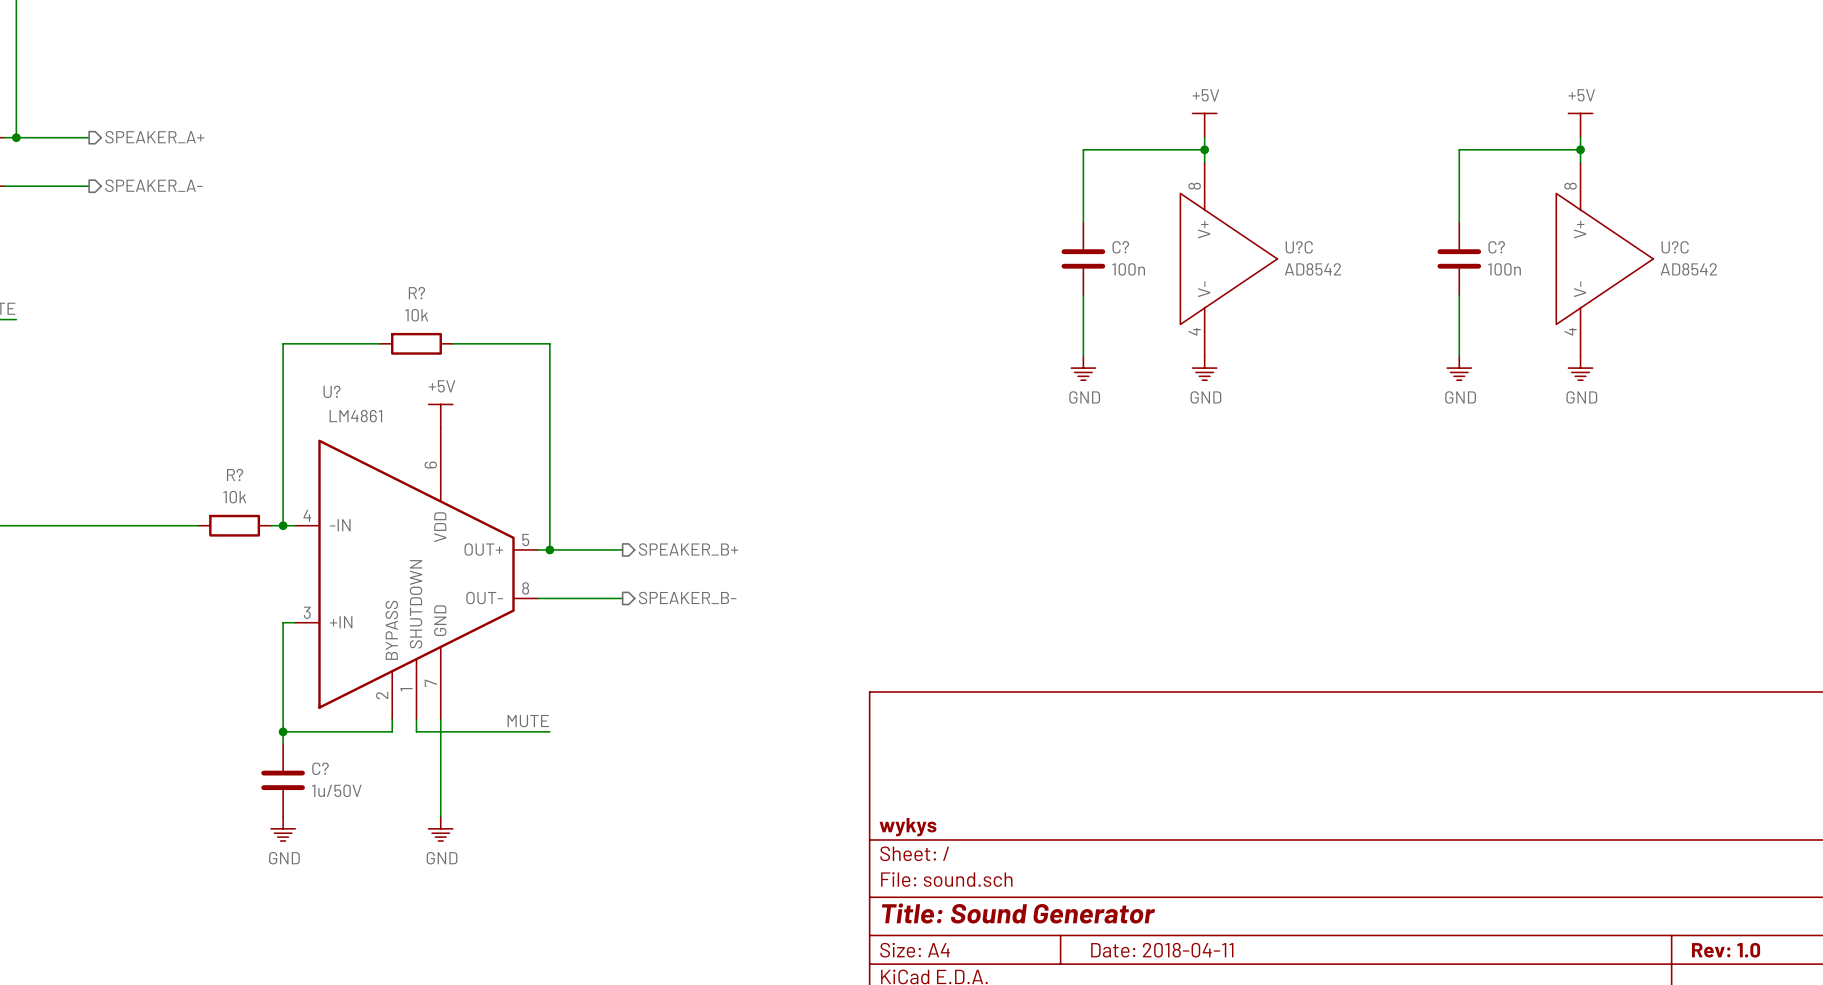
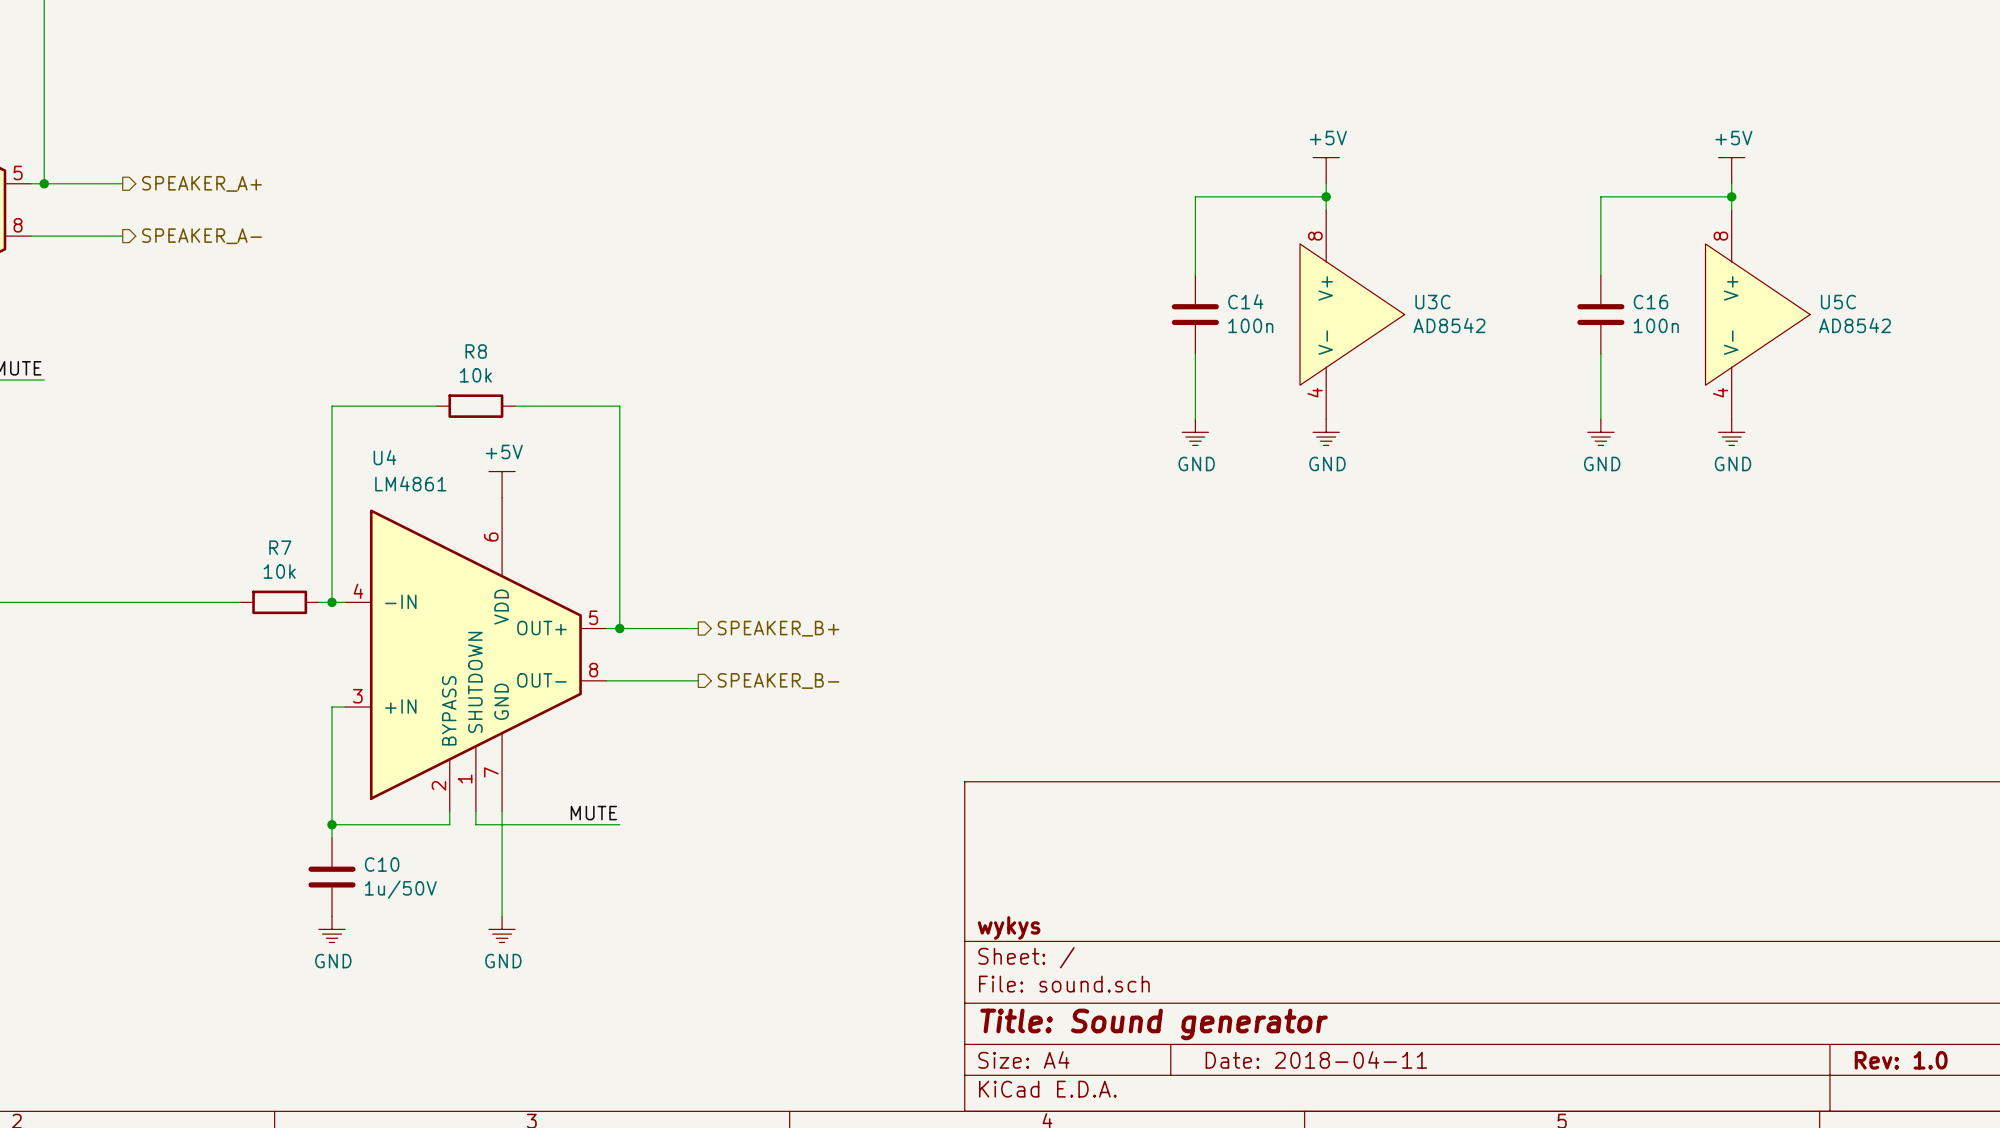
C? name: C? (1120, 247) -> C14 (1245, 301)
U?C name: U?C (1299, 247) -> U3C (1432, 302)
C? name: C? (1496, 247) -> C16 (1650, 302)
U?C name: U?C (1675, 247) -> U5C (1838, 302)
R? name: R? (416, 293) -> R8 (476, 351)
U? name: U? (331, 391) -> U4 (384, 457)
R? name: R? (235, 474) -> R7 (280, 547)
C? name: C? (320, 768) -> C10 (382, 864)
title block: Title: Sound Generator (1018, 913) -> Title: Sound generator (1154, 1024)

